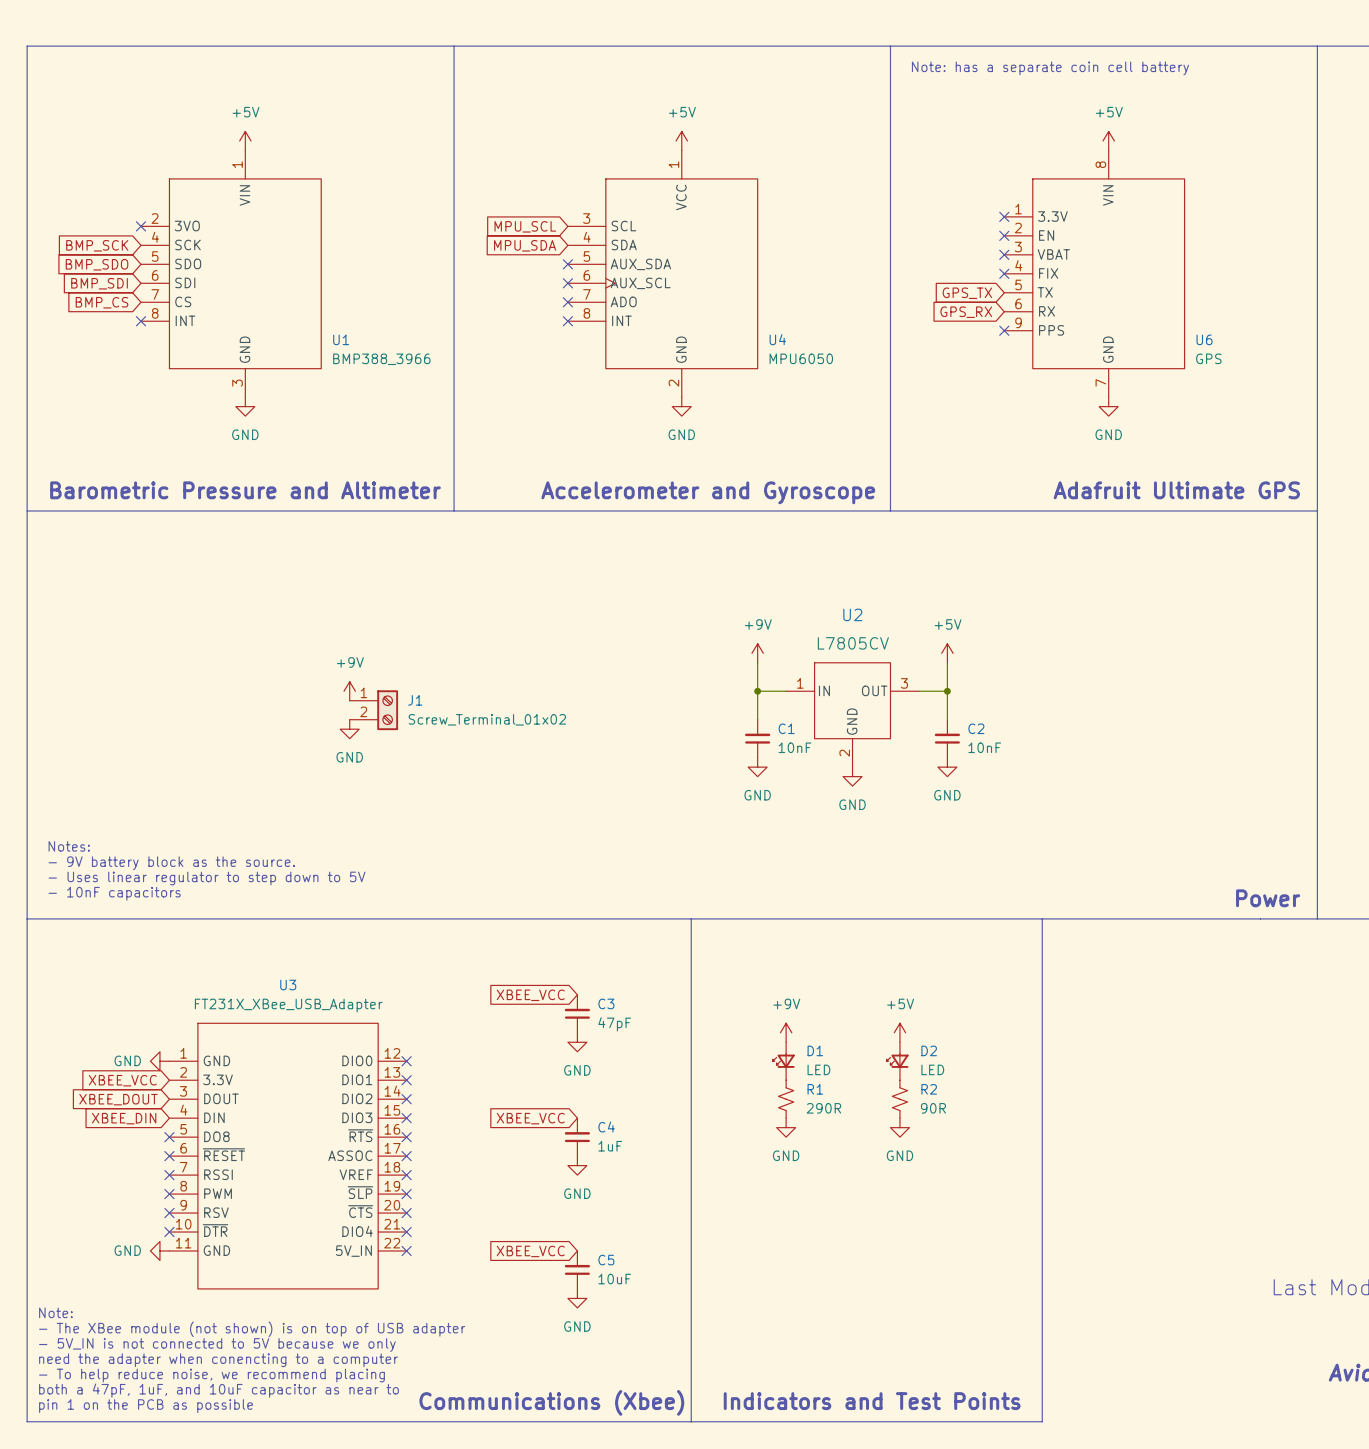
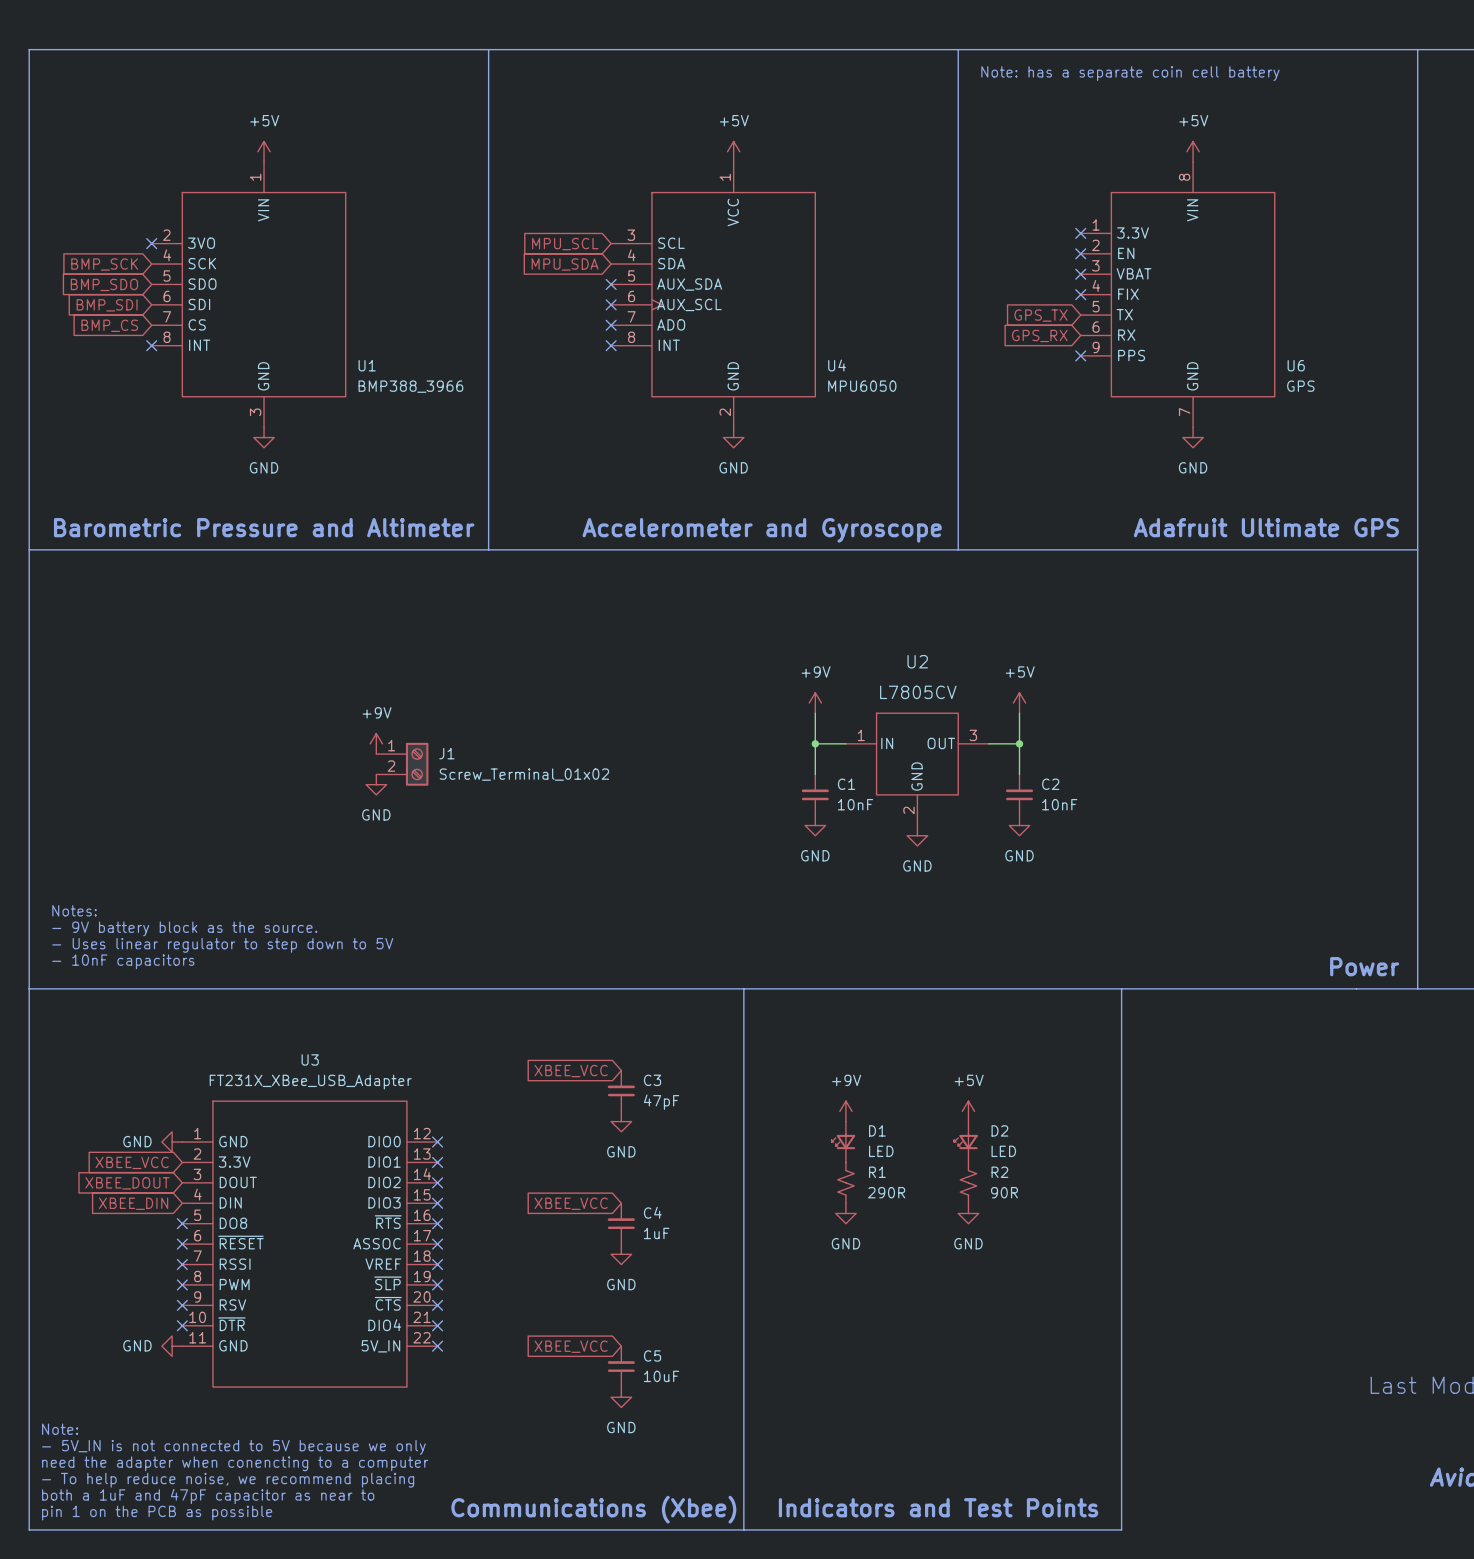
text: Note: (55, 1312) -> none
text: - The XBee module (not shown) is on top of USB adapter (252, 1329) -> Note: (60, 1429)
text: both a 47pF, 1uF, and 10uF capacitor as near to (218, 1390) -> both a 1uF and 47pF capacitor as near to (208, 1496)

